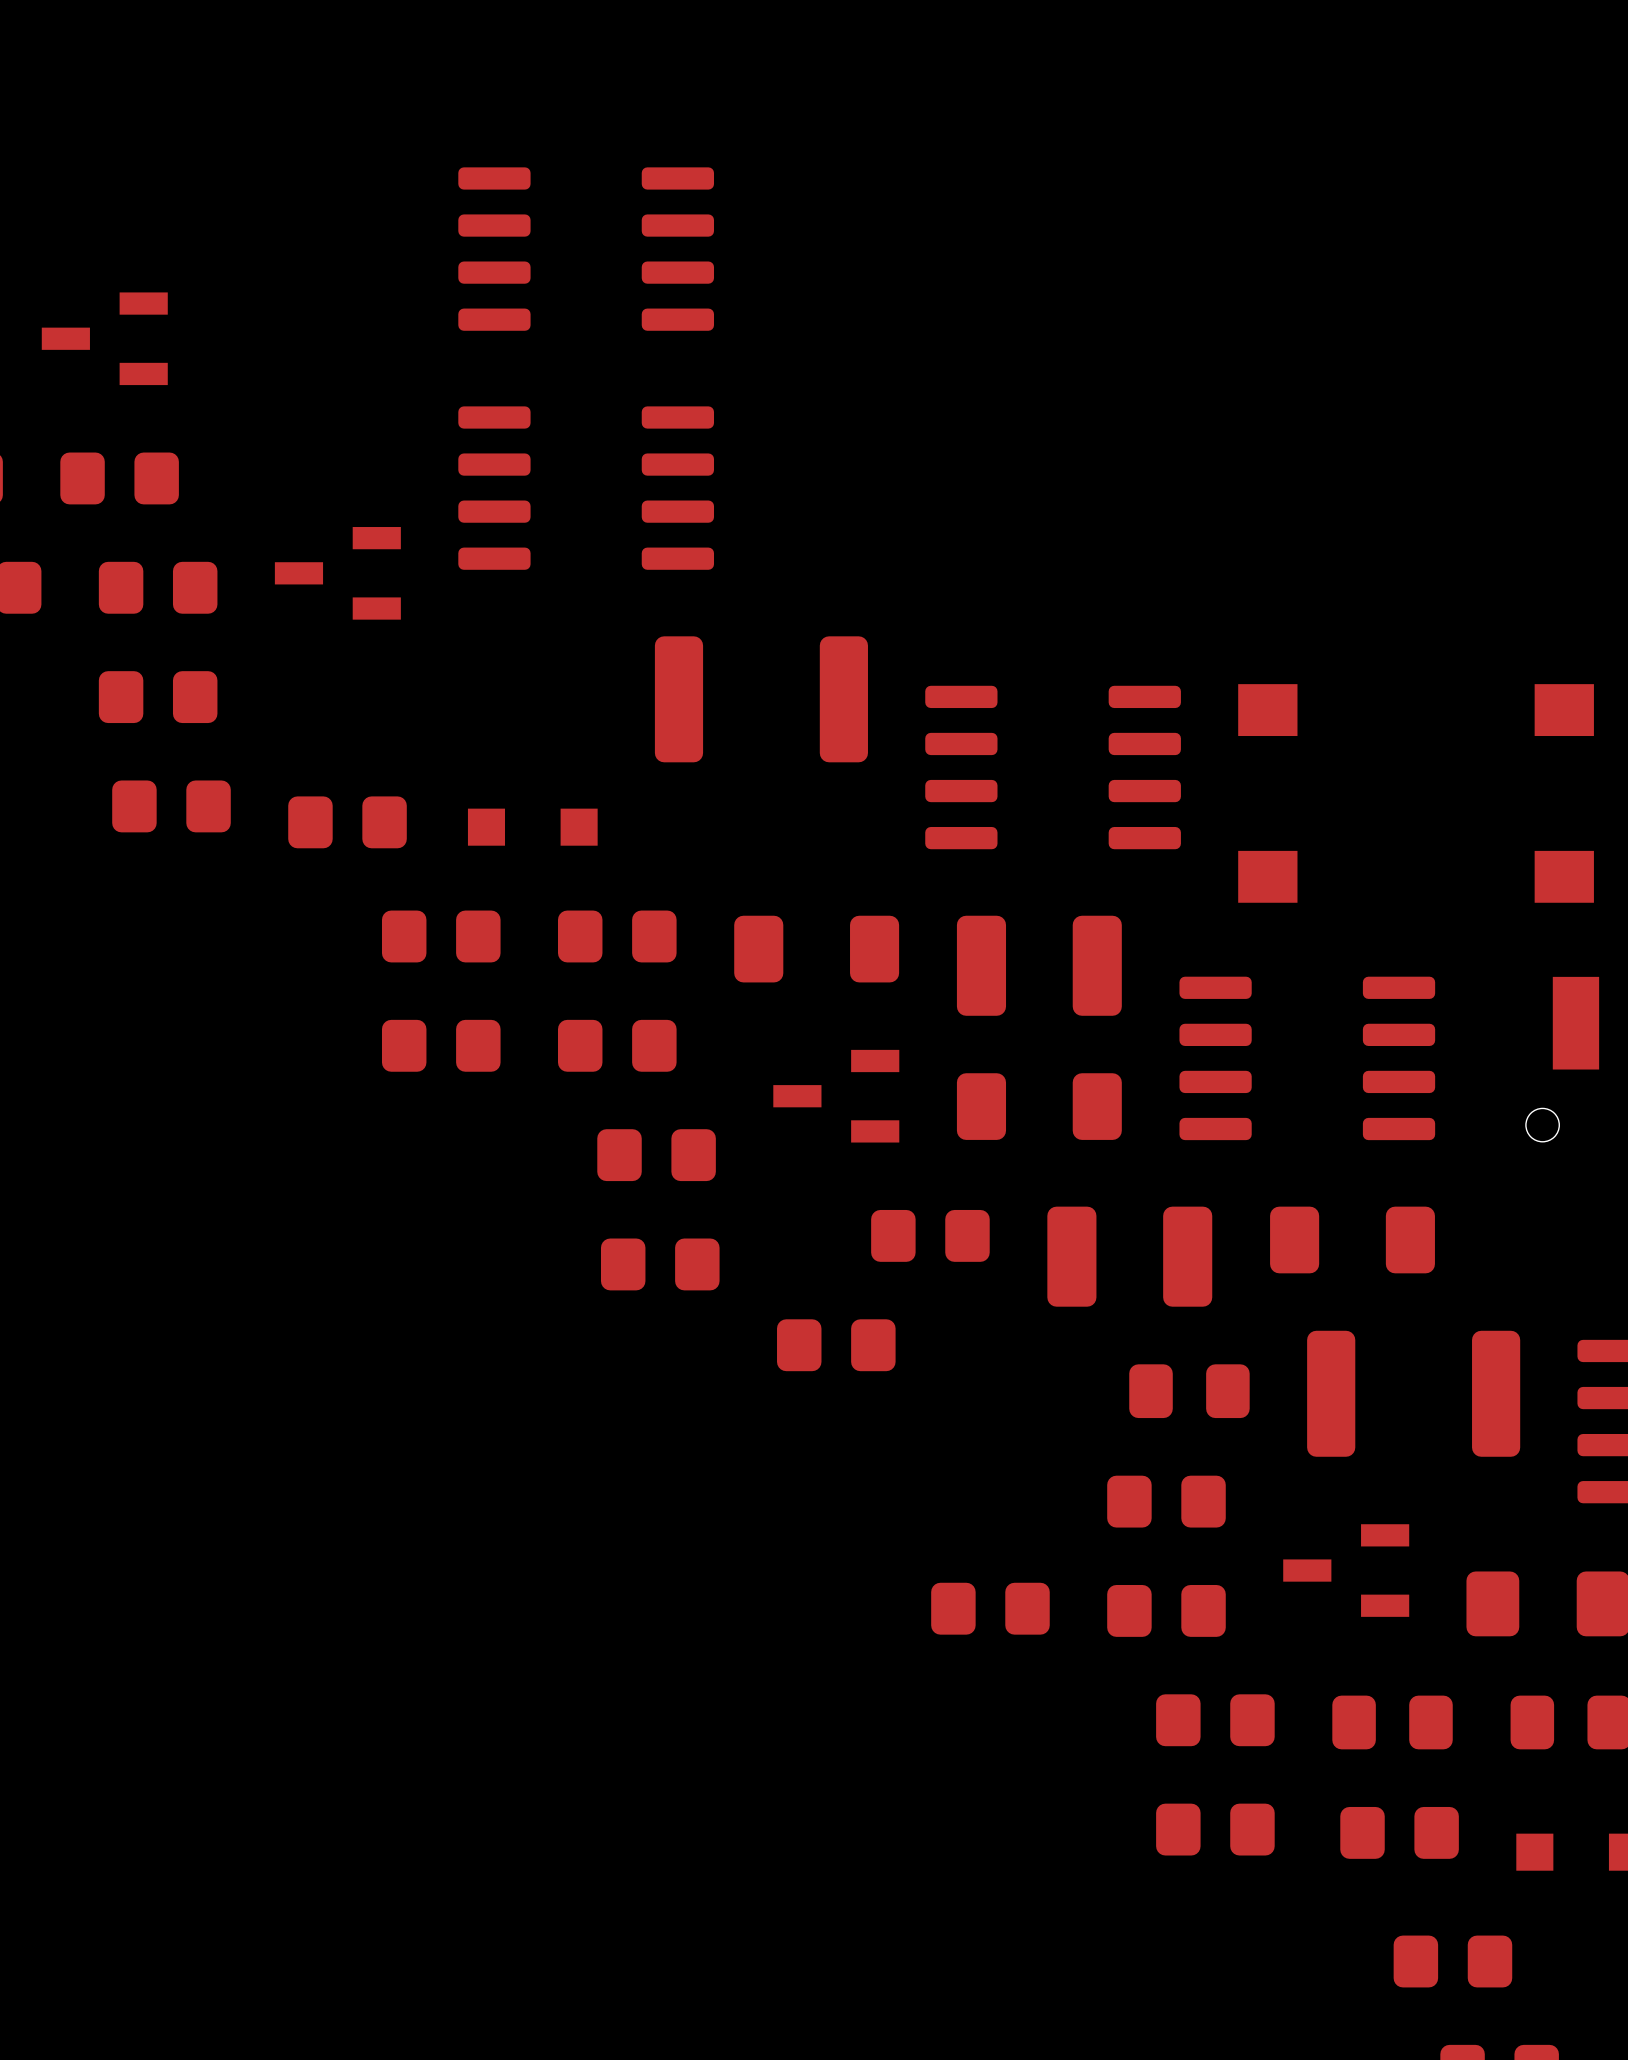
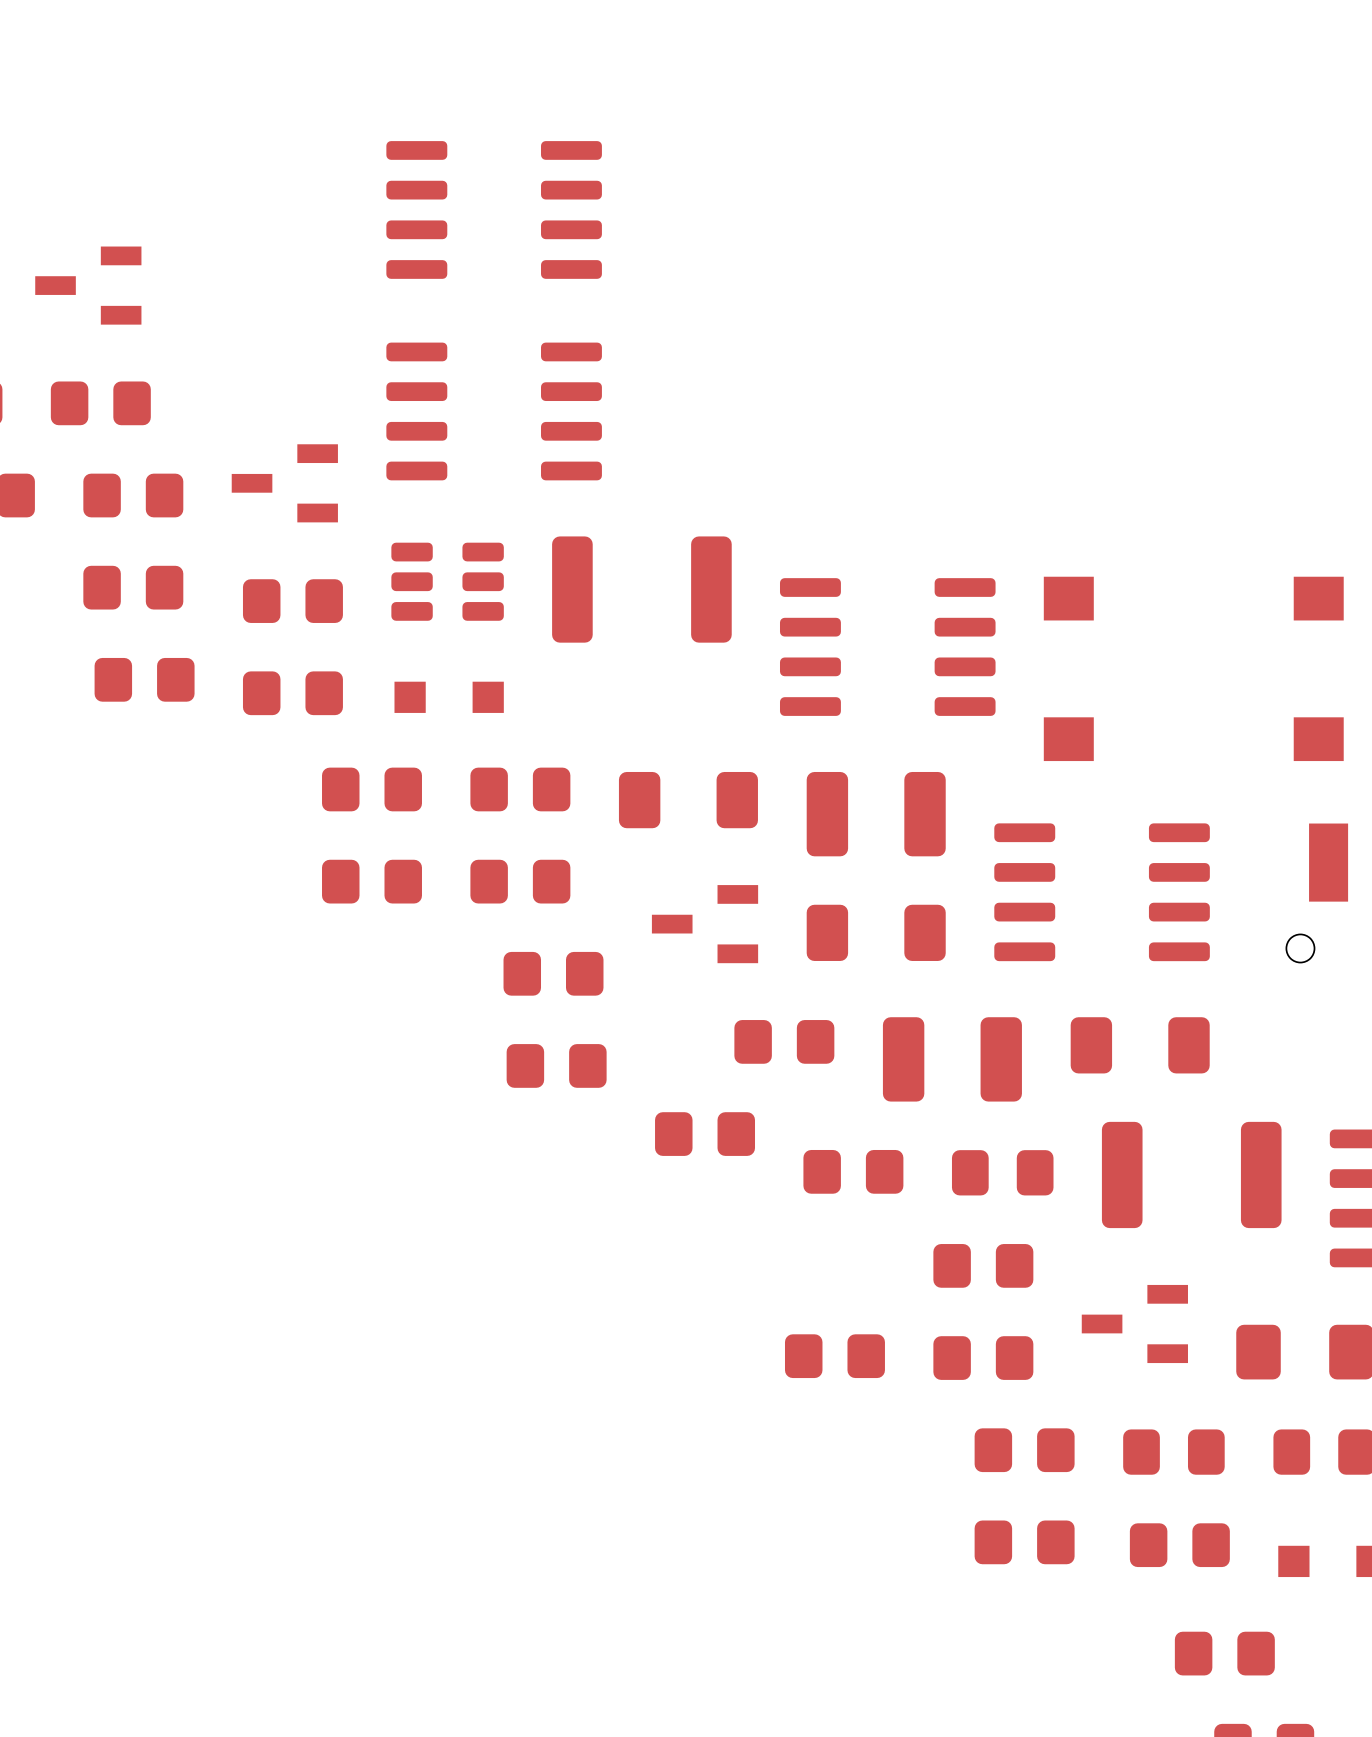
part: none -> (447, 581)
part: none -> (292, 601)
part: none -> (853, 1171)

